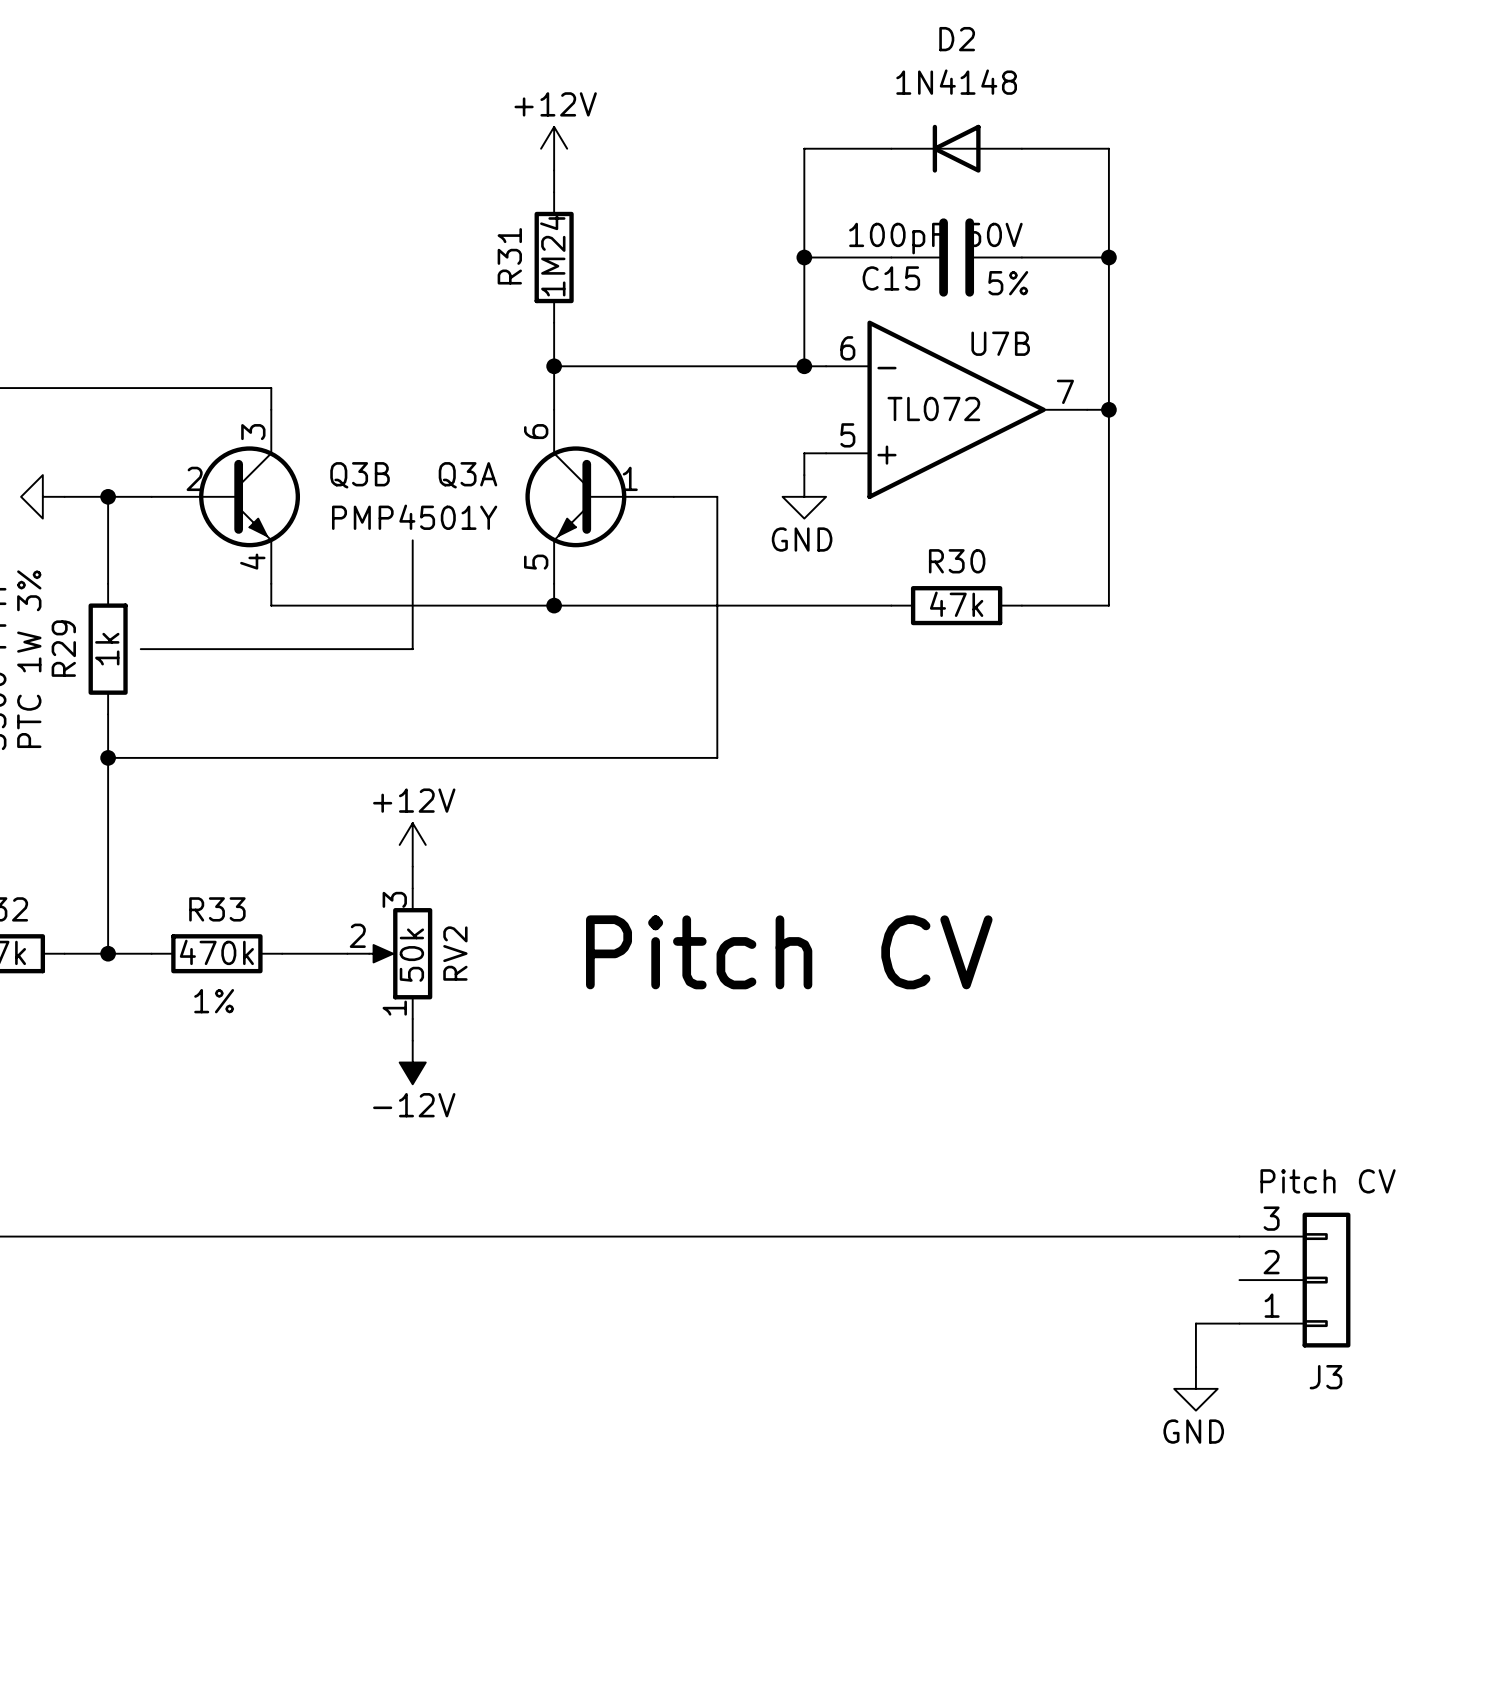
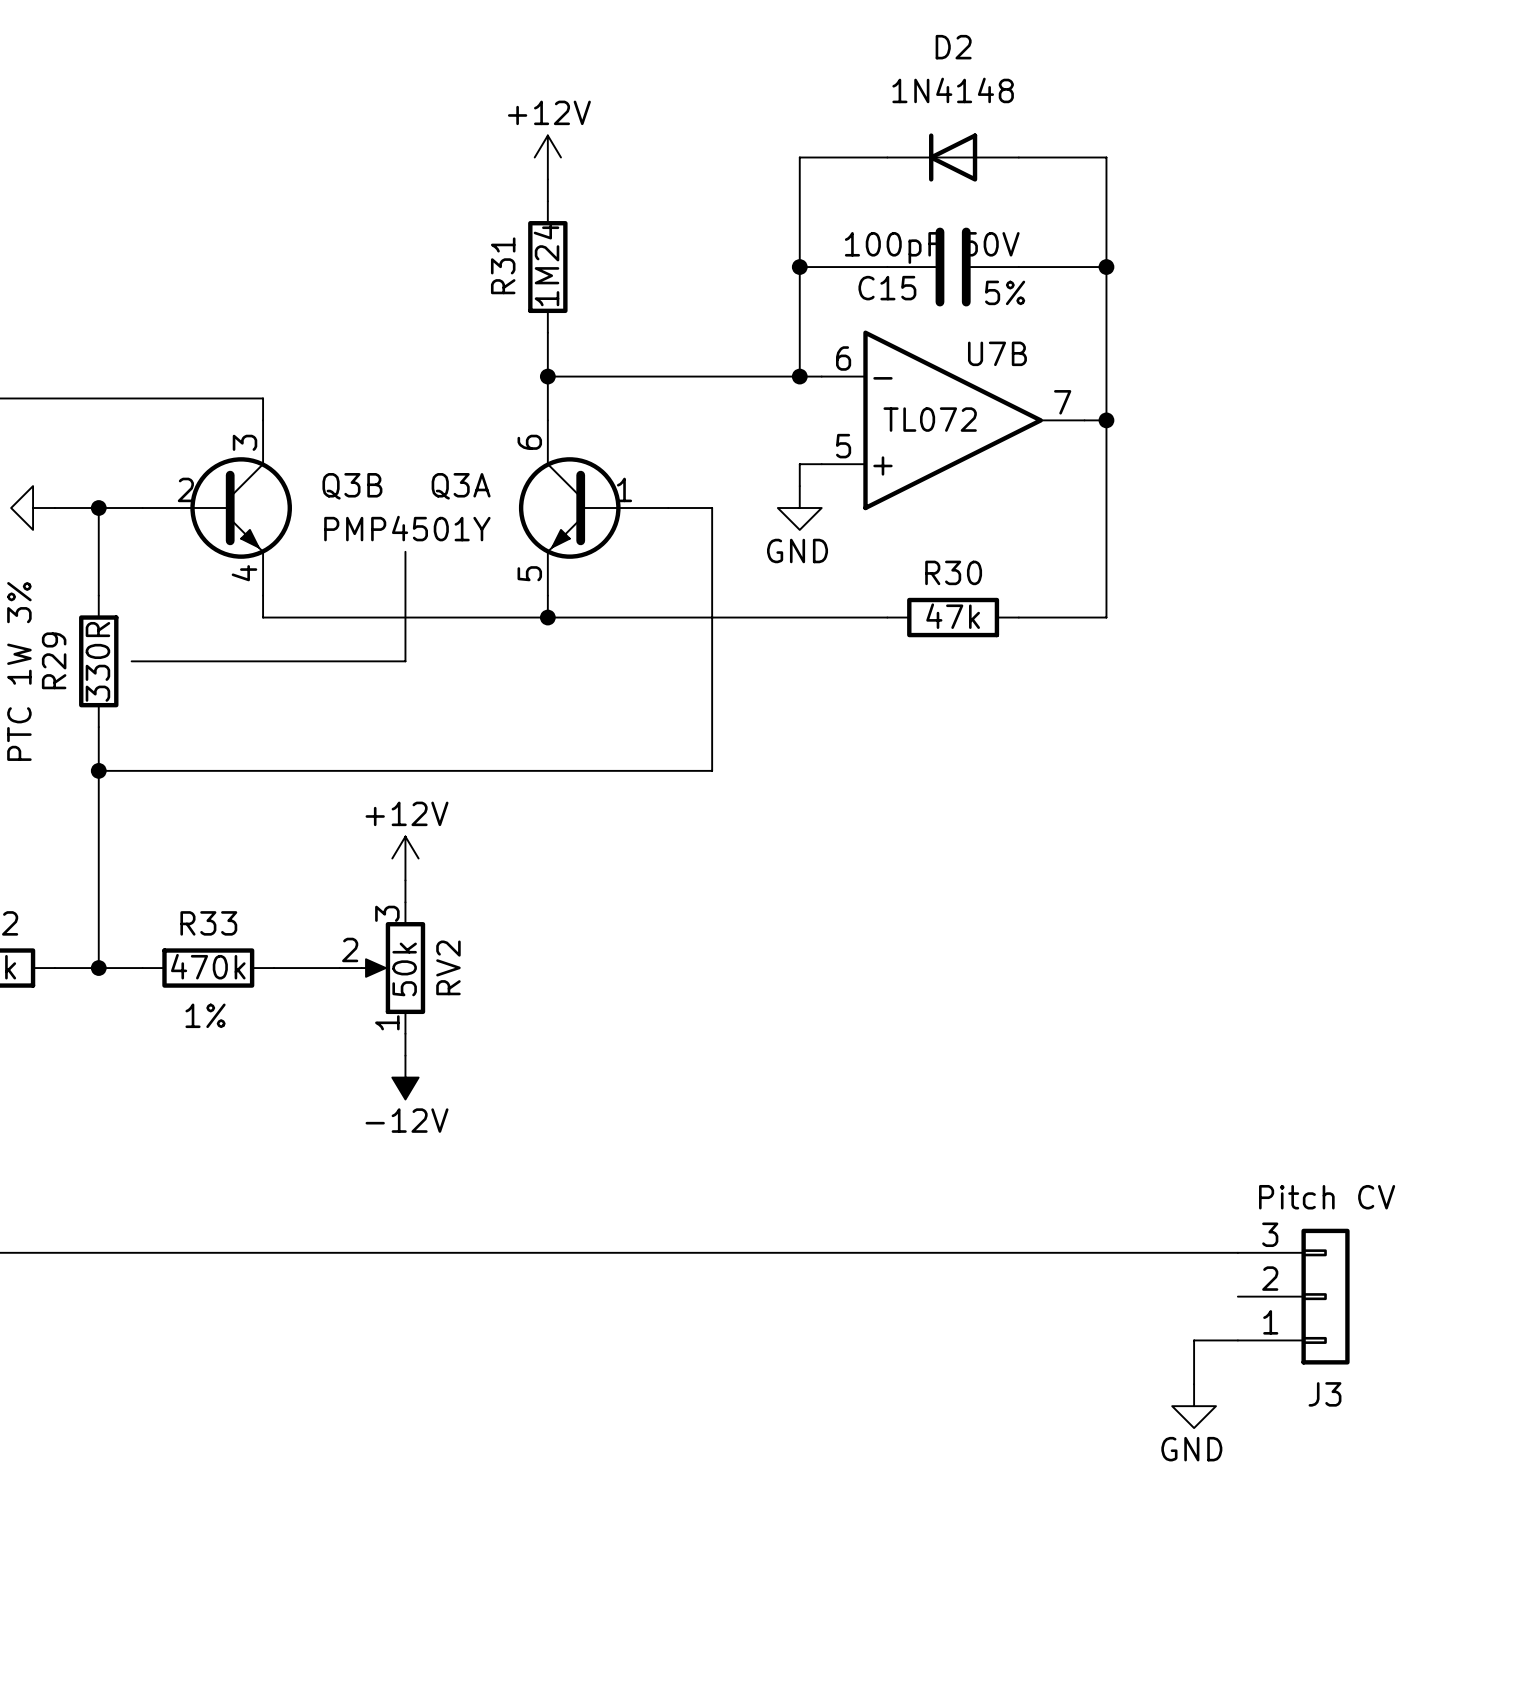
R29 value: 1k (107, 649) -> 330R (97, 661)
text: Pitch CV (789, 952) -> none

